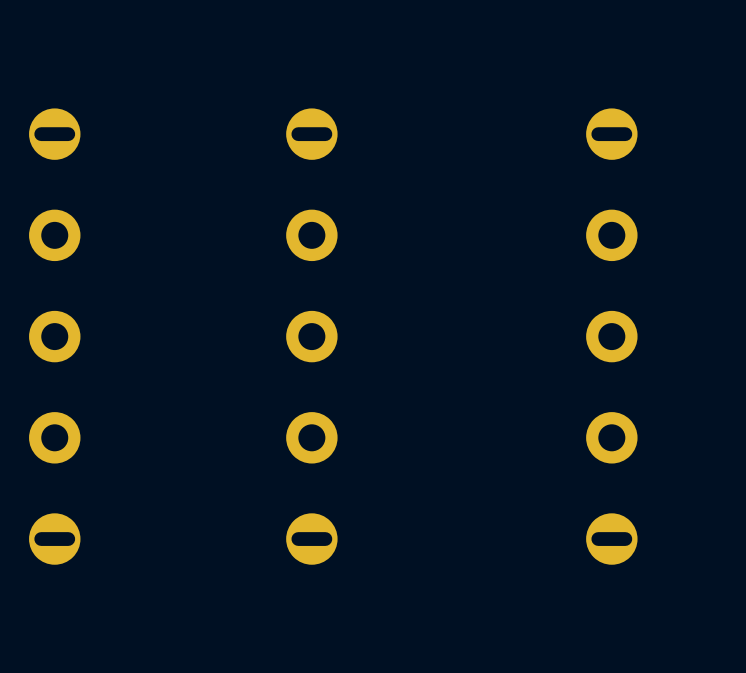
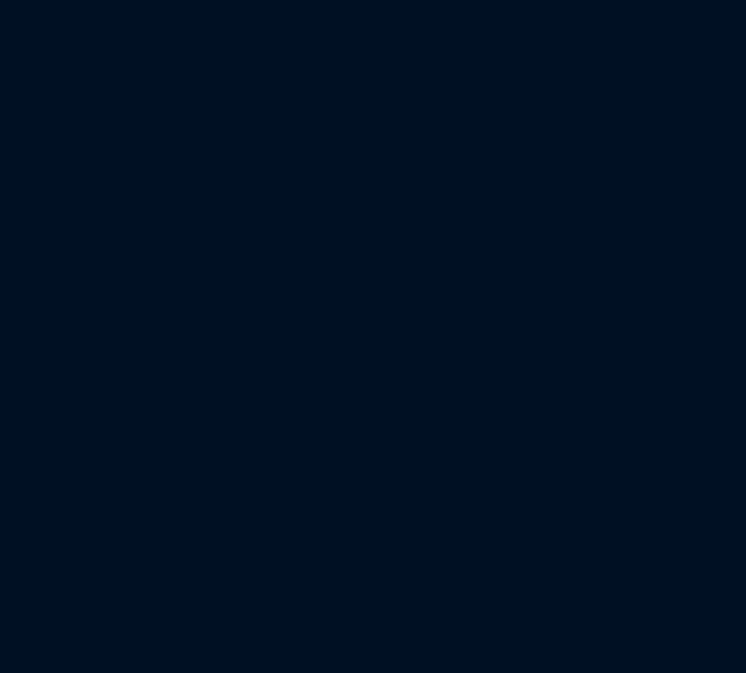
part: (54, 336) -> none
part: (311, 336) -> none
part: (611, 336) -> none

